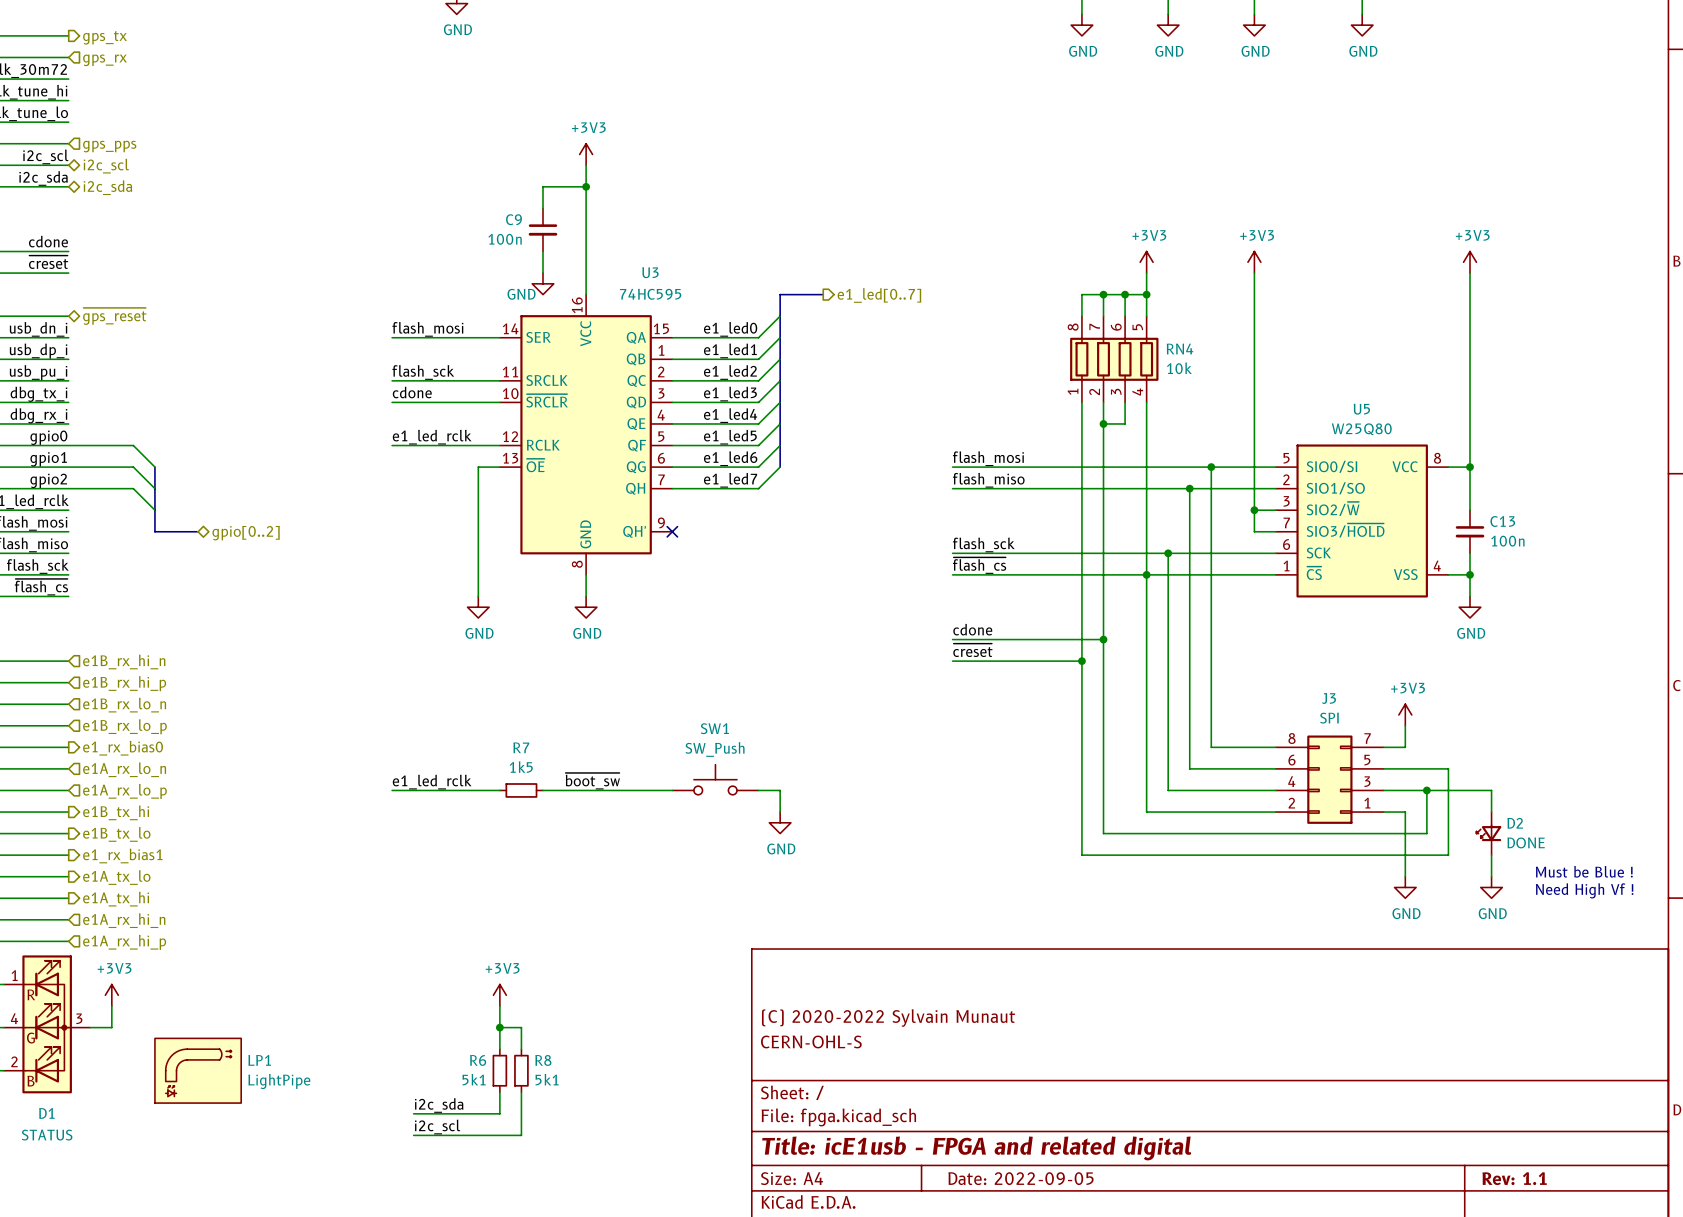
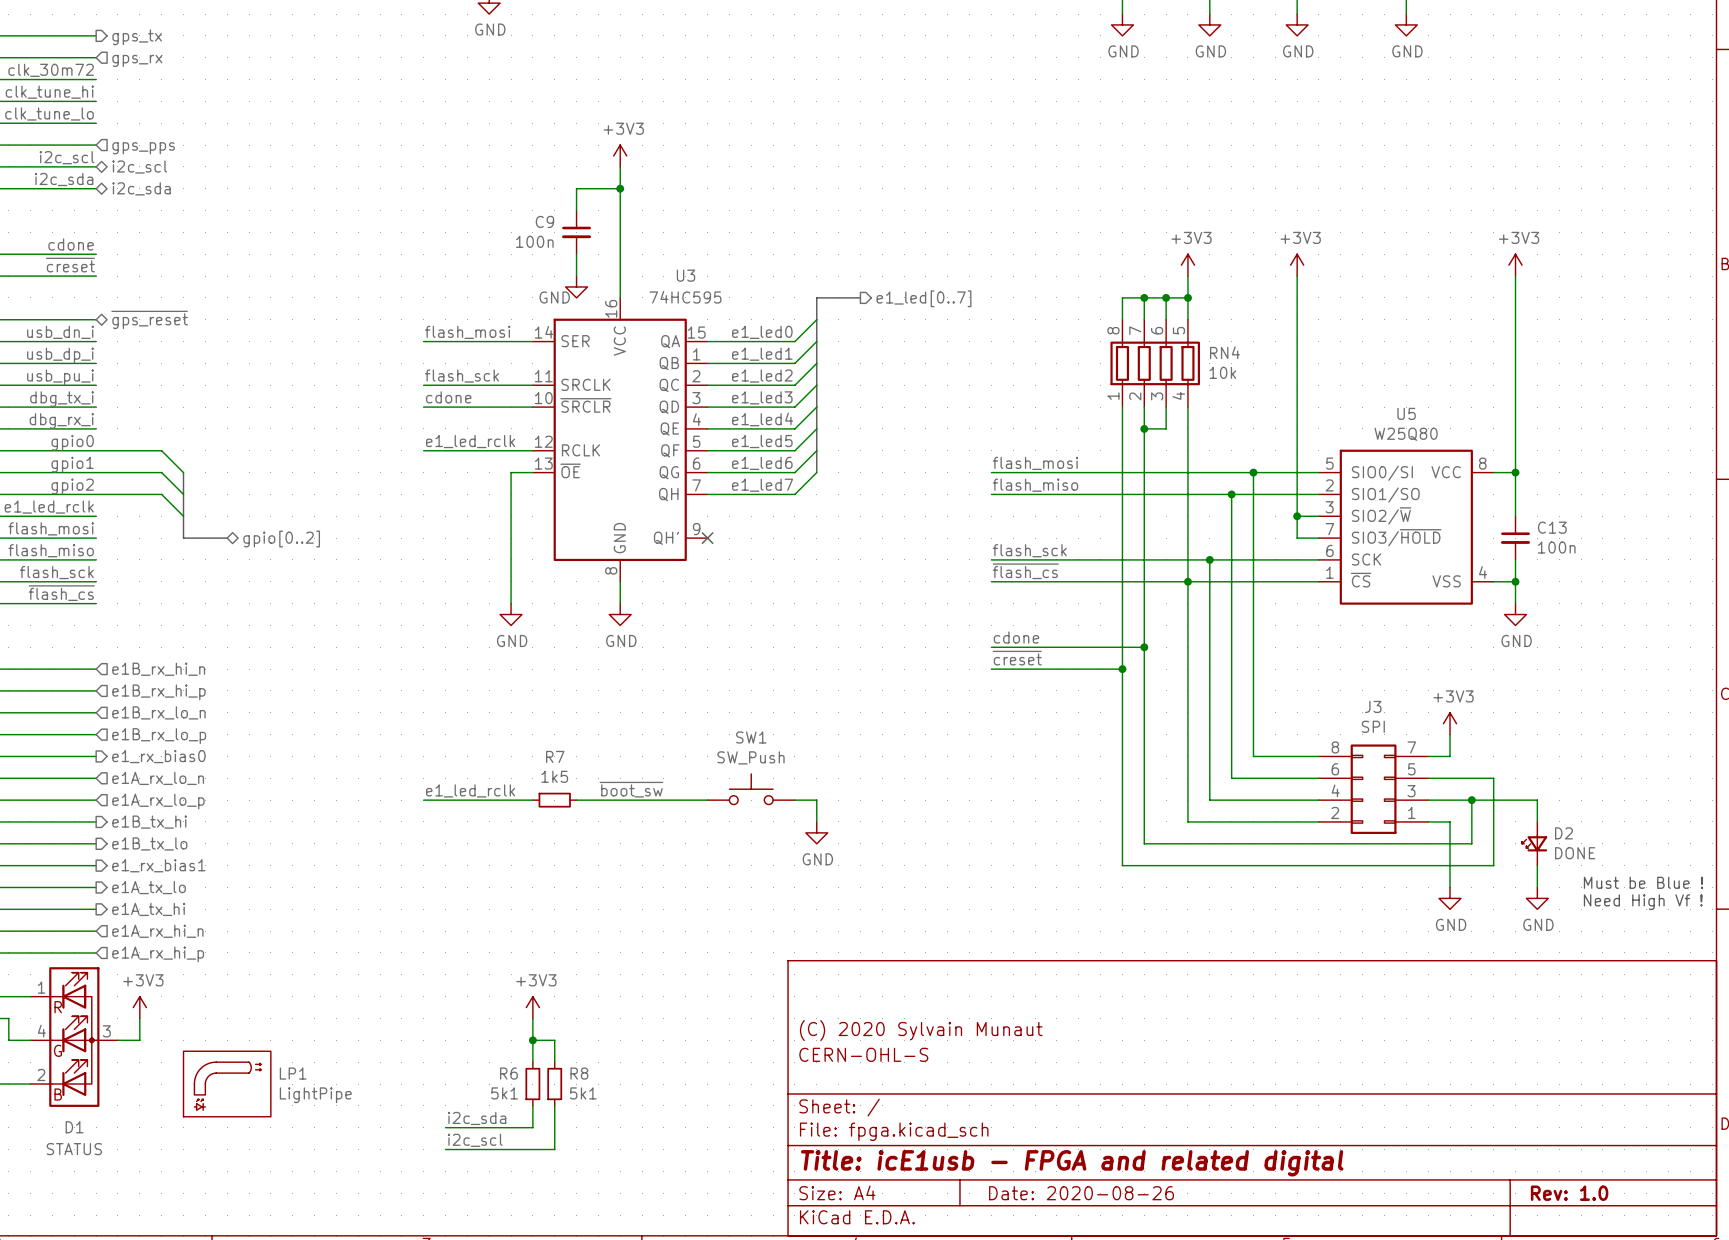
title block: (C) 2020-2022 Sylvain Munaut (888, 1018) -> (C) 2020 Sylvain Munaut (921, 1030)
title block: Date: 2022-09-05 (1020, 1178) -> Date: 2020-08-26 (1081, 1193)
title block: Rev: 1.1 (1514, 1178) -> Rev: 1.0 (1569, 1193)

